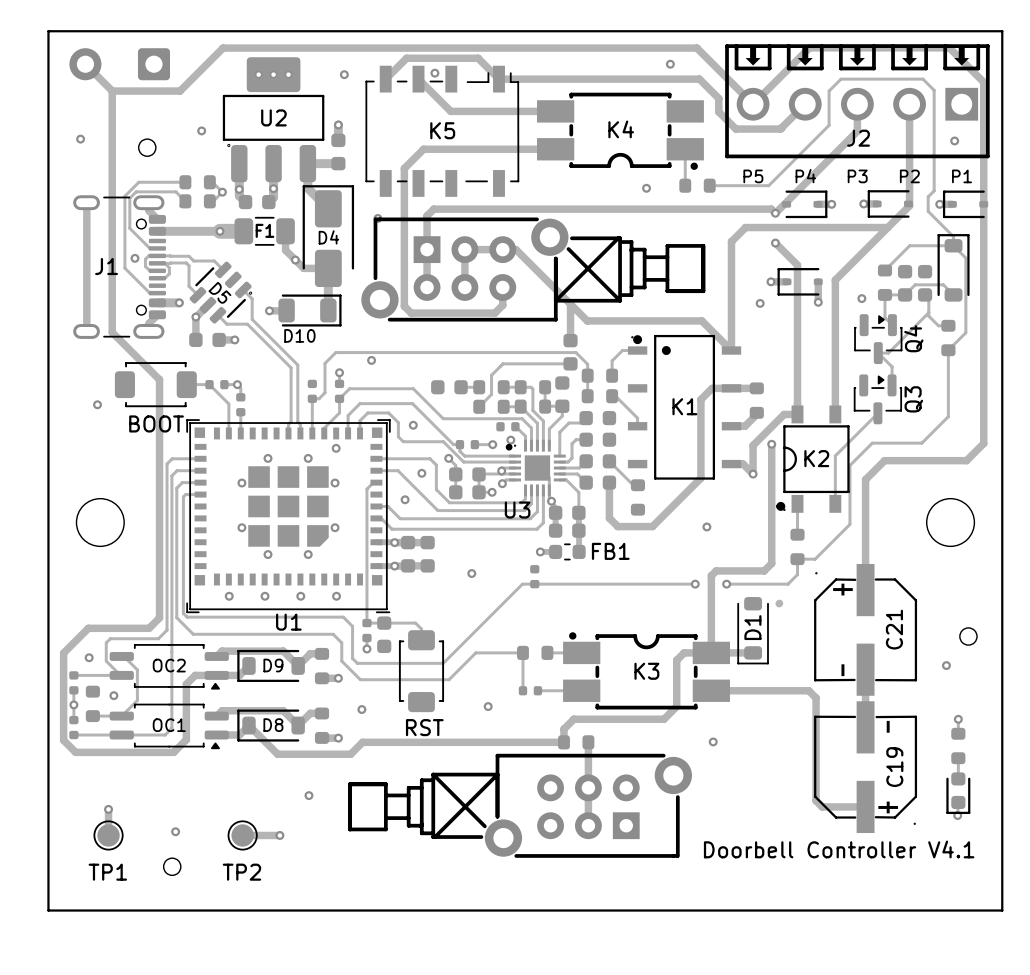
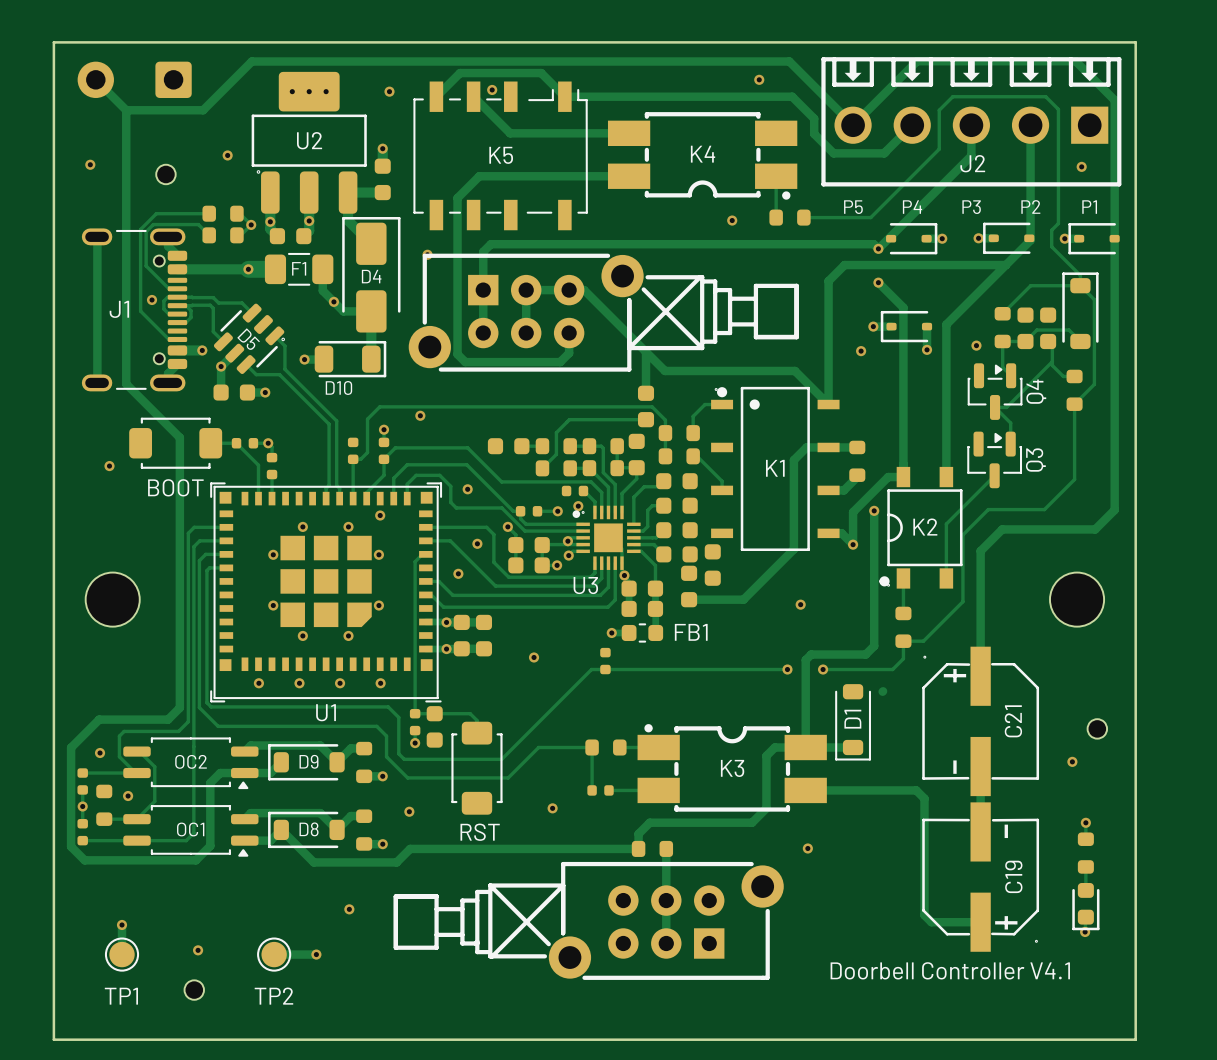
track: (609, 461) (633, 485) (637, 485) -> none
part footprint: [630, 479, 646, 516] -> [704, 544, 721, 586]
track: (609, 482) (609, 518) (617, 526) (652, 526) (656, 522) -> (689, 599) (743, 599)
part: none -> (689, 586)

